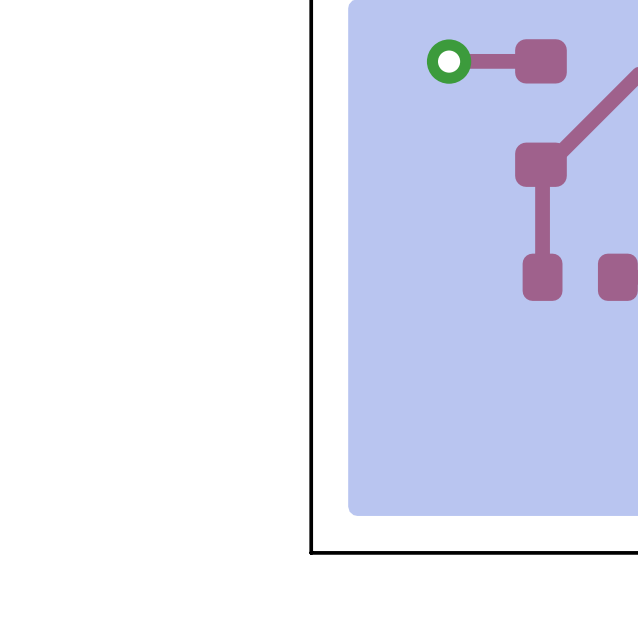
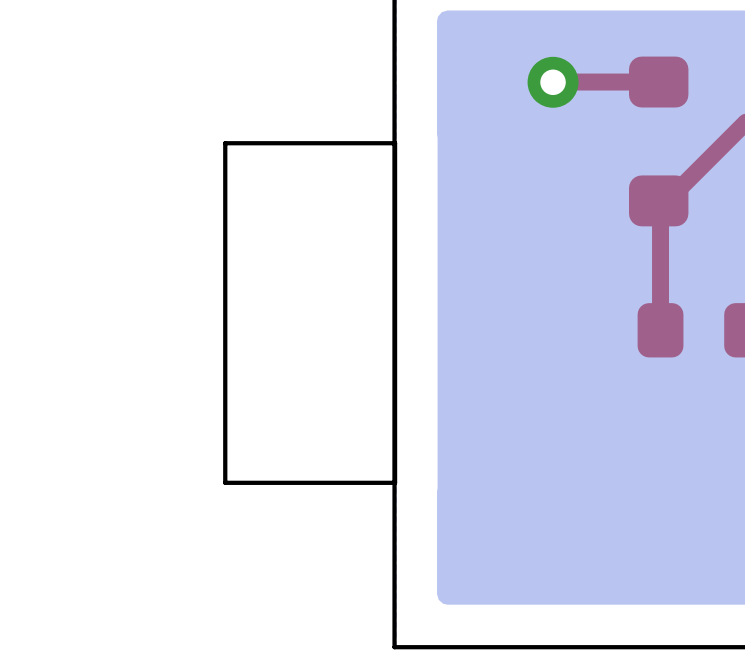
board edge: none -> (395, 143) (225, 143) (225, 482) (395, 482) (395, 143)

